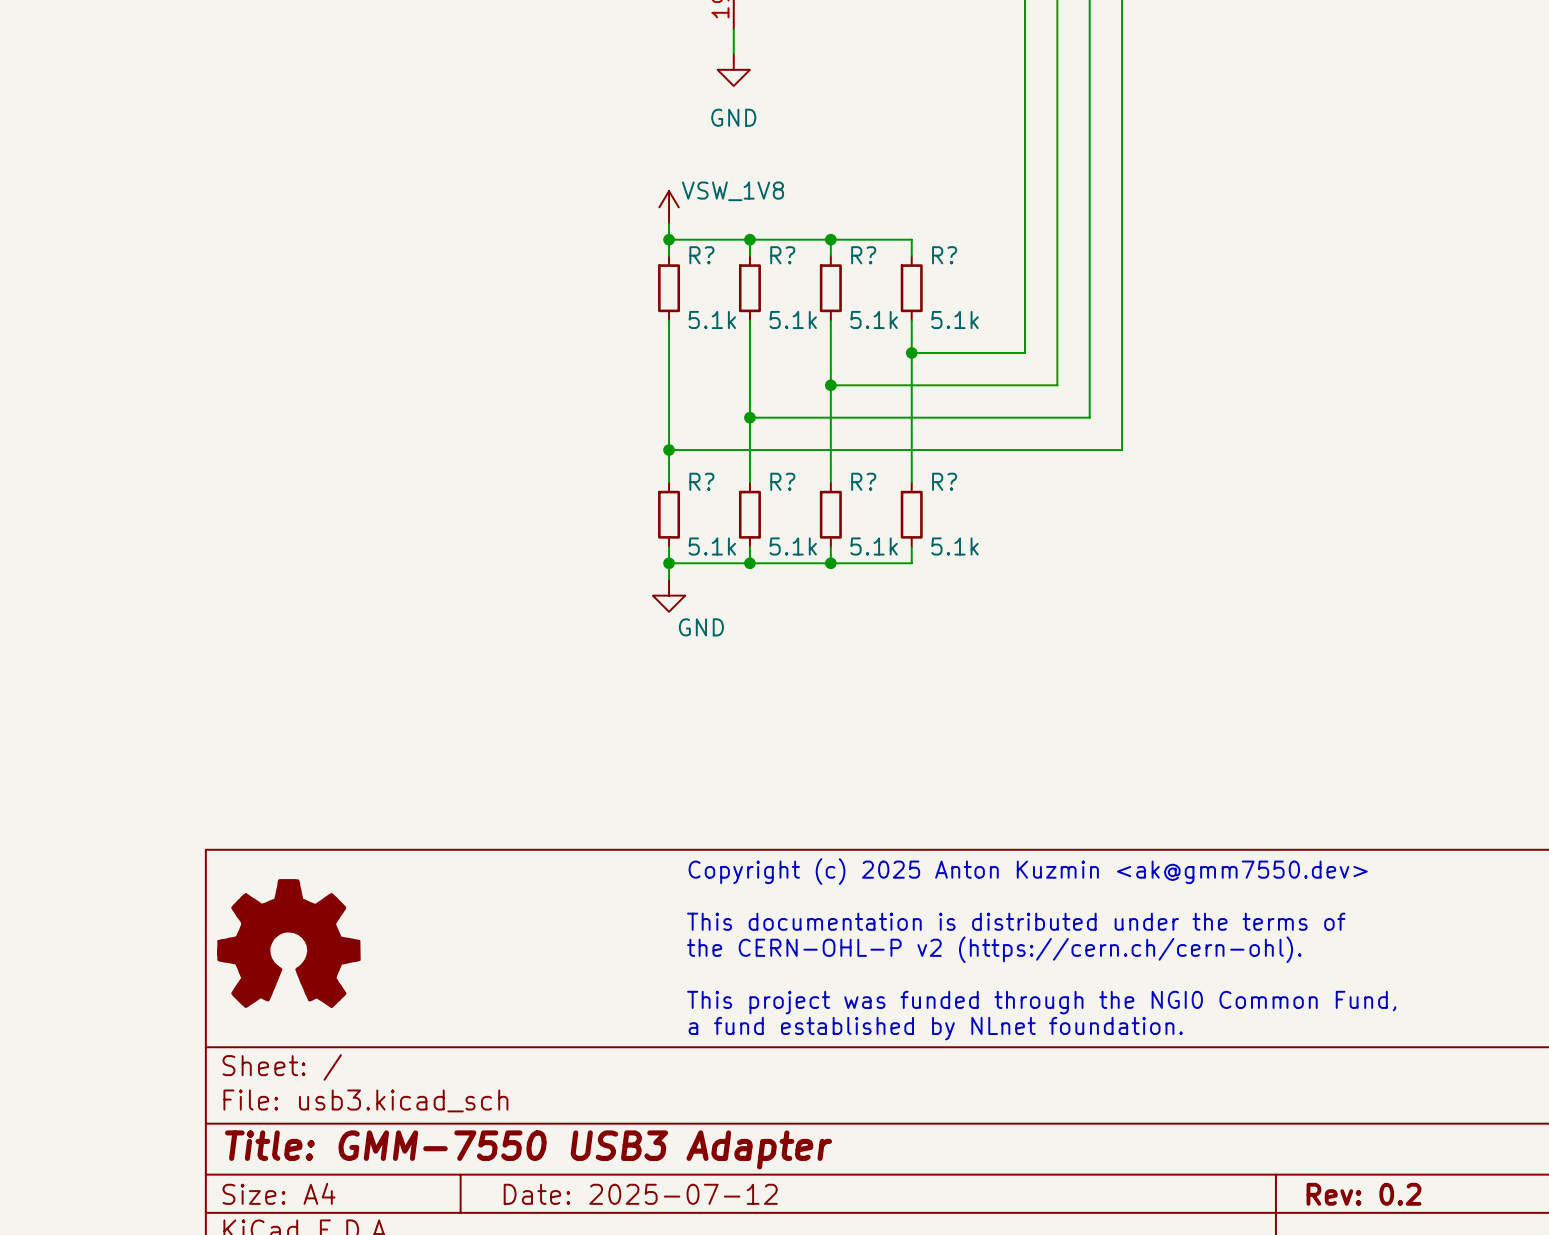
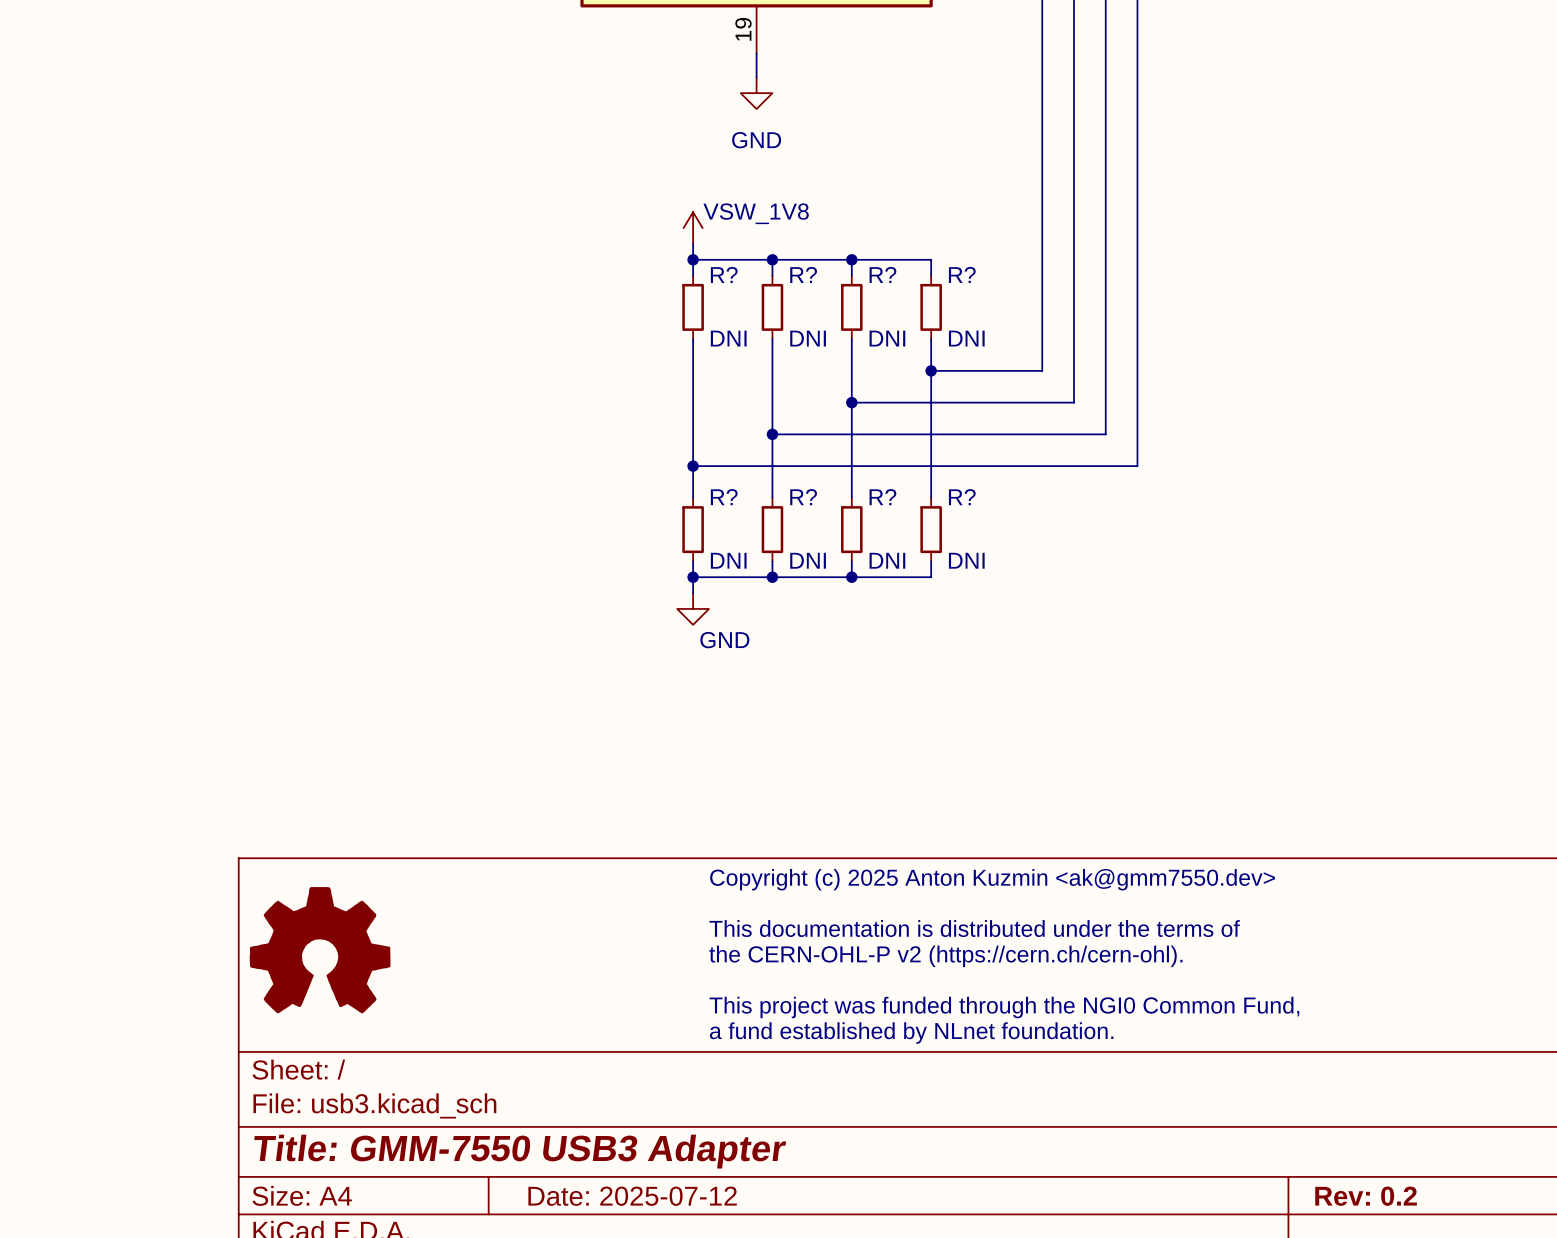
R? value: 5.1k (712, 319) -> DNI (728, 338)
R? value: 5.1k (793, 319) -> DNI (808, 338)
R? value: 5.1k (874, 319) -> DNI (887, 338)
R? value: 5.1k (954, 319) -> DNI (966, 338)
R? value: 5.1k (712, 546) -> DNI (728, 560)
R? value: 5.1k (793, 546) -> DNI (808, 560)
R? value: 5.1k (874, 546) -> DNI (887, 560)
R? value: 5.1k (954, 546) -> DNI (966, 560)

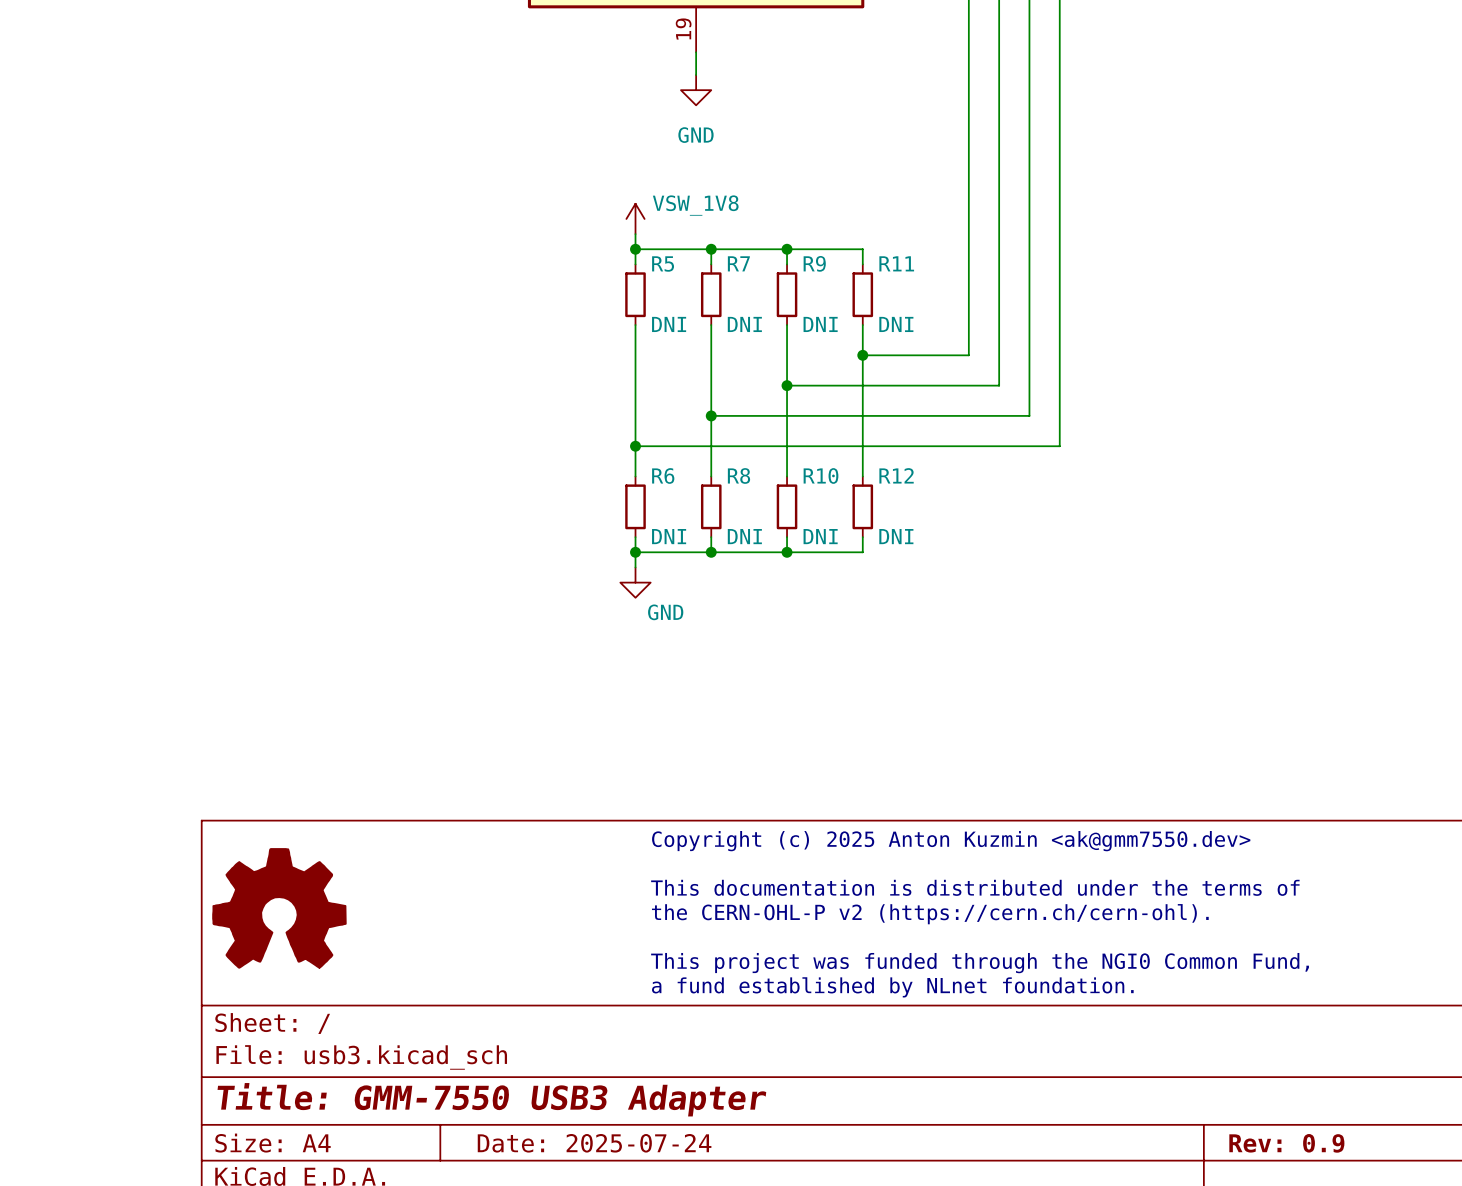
R? name: R? (724, 274) -> R5 (663, 263)
R? name: R? (803, 274) -> R7 (738, 263)
R? name: R? (882, 274) -> R9 (814, 263)
R? name: R? (962, 274) -> R11 (896, 263)
R? name: R? (724, 497) -> R6 (663, 475)
R? name: R? (803, 497) -> R8 (738, 475)
R? name: R? (882, 497) -> R10 (820, 475)
R? name: R? (962, 497) -> R12 (896, 475)
title block: Date: 2025-07-12 (632, 1196) -> Date: 2025-07-24 (594, 1143)
title block: Rev: 0.2 (1366, 1196) -> Rev: 0.9 (1286, 1143)

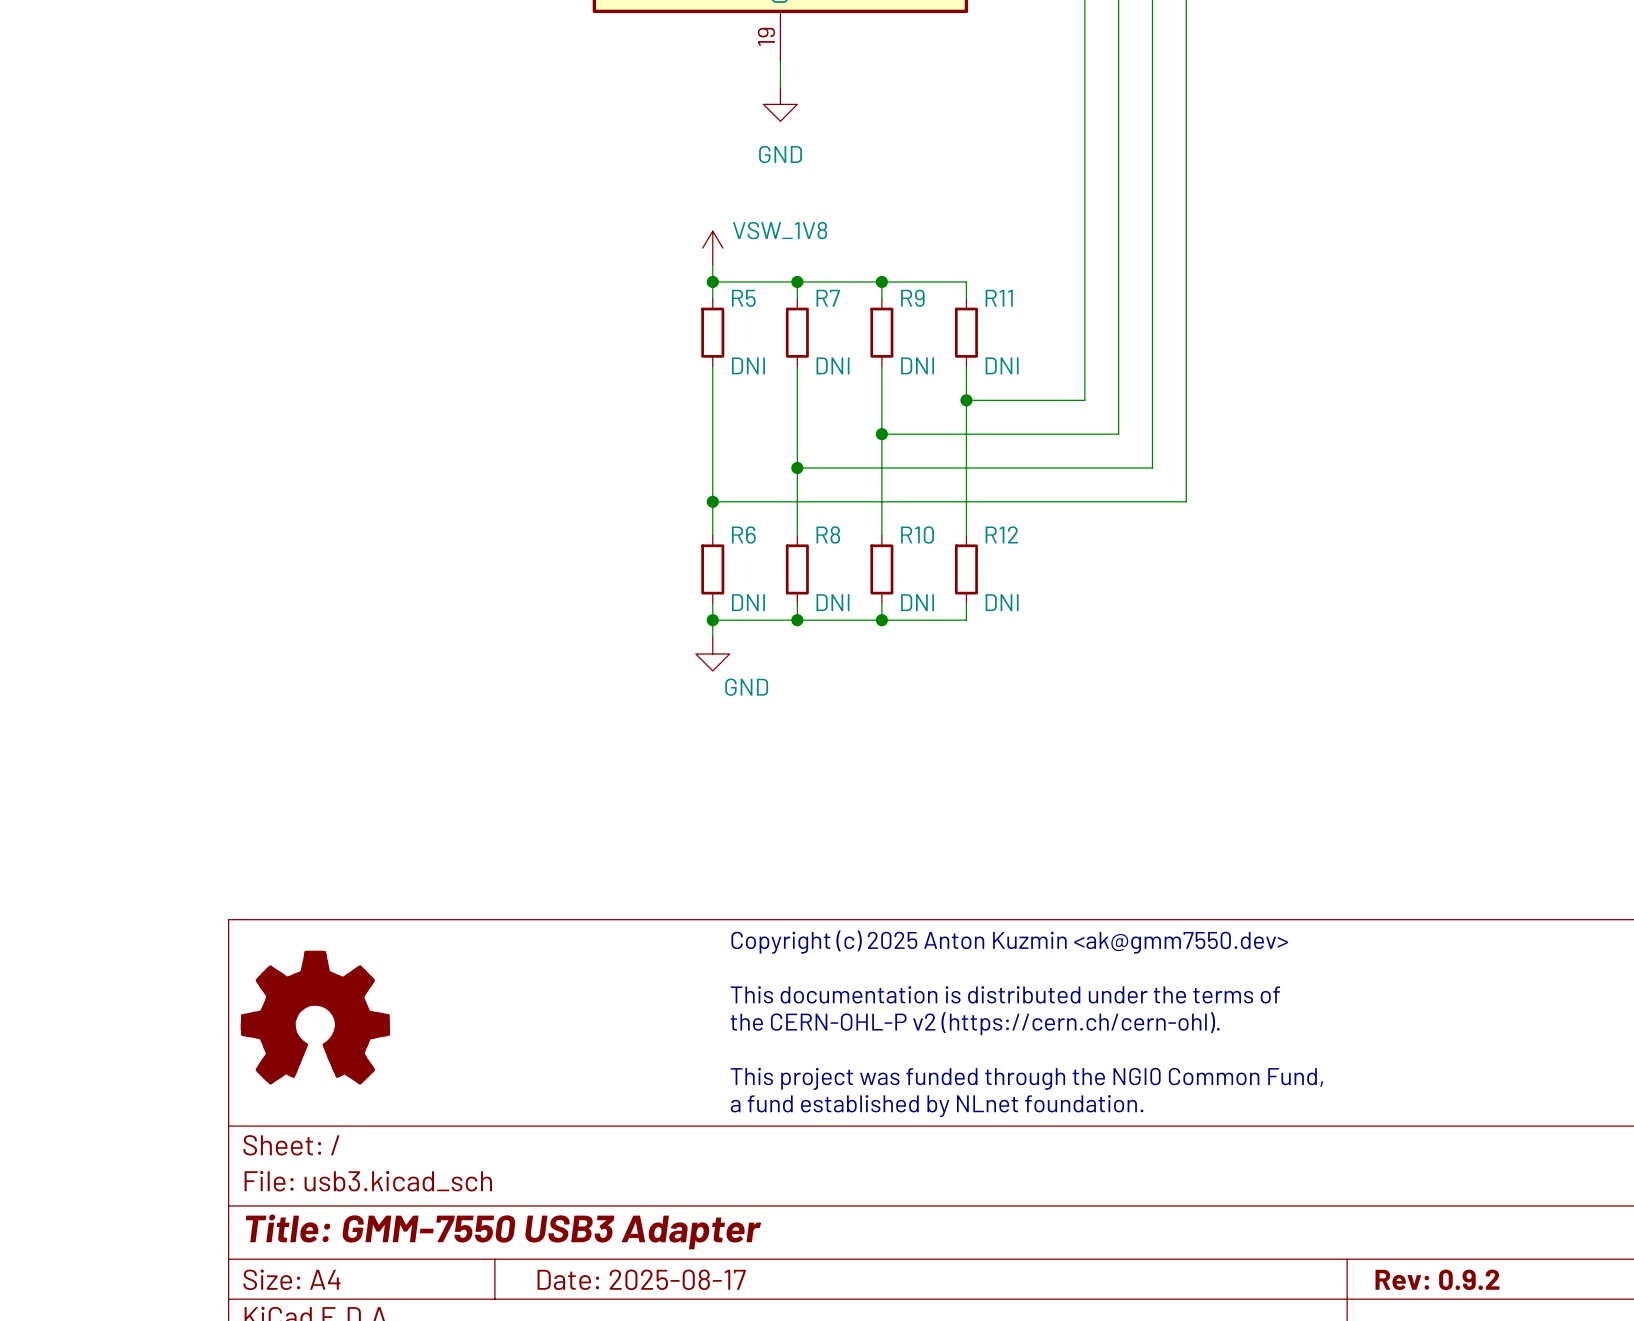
title block: Date: 2025-07-24 (594, 1143) -> Date: 2025-08-17 (641, 1279)
title block: Rev: 0.9 (1286, 1143) -> Rev: 0.9.2 (1437, 1279)

